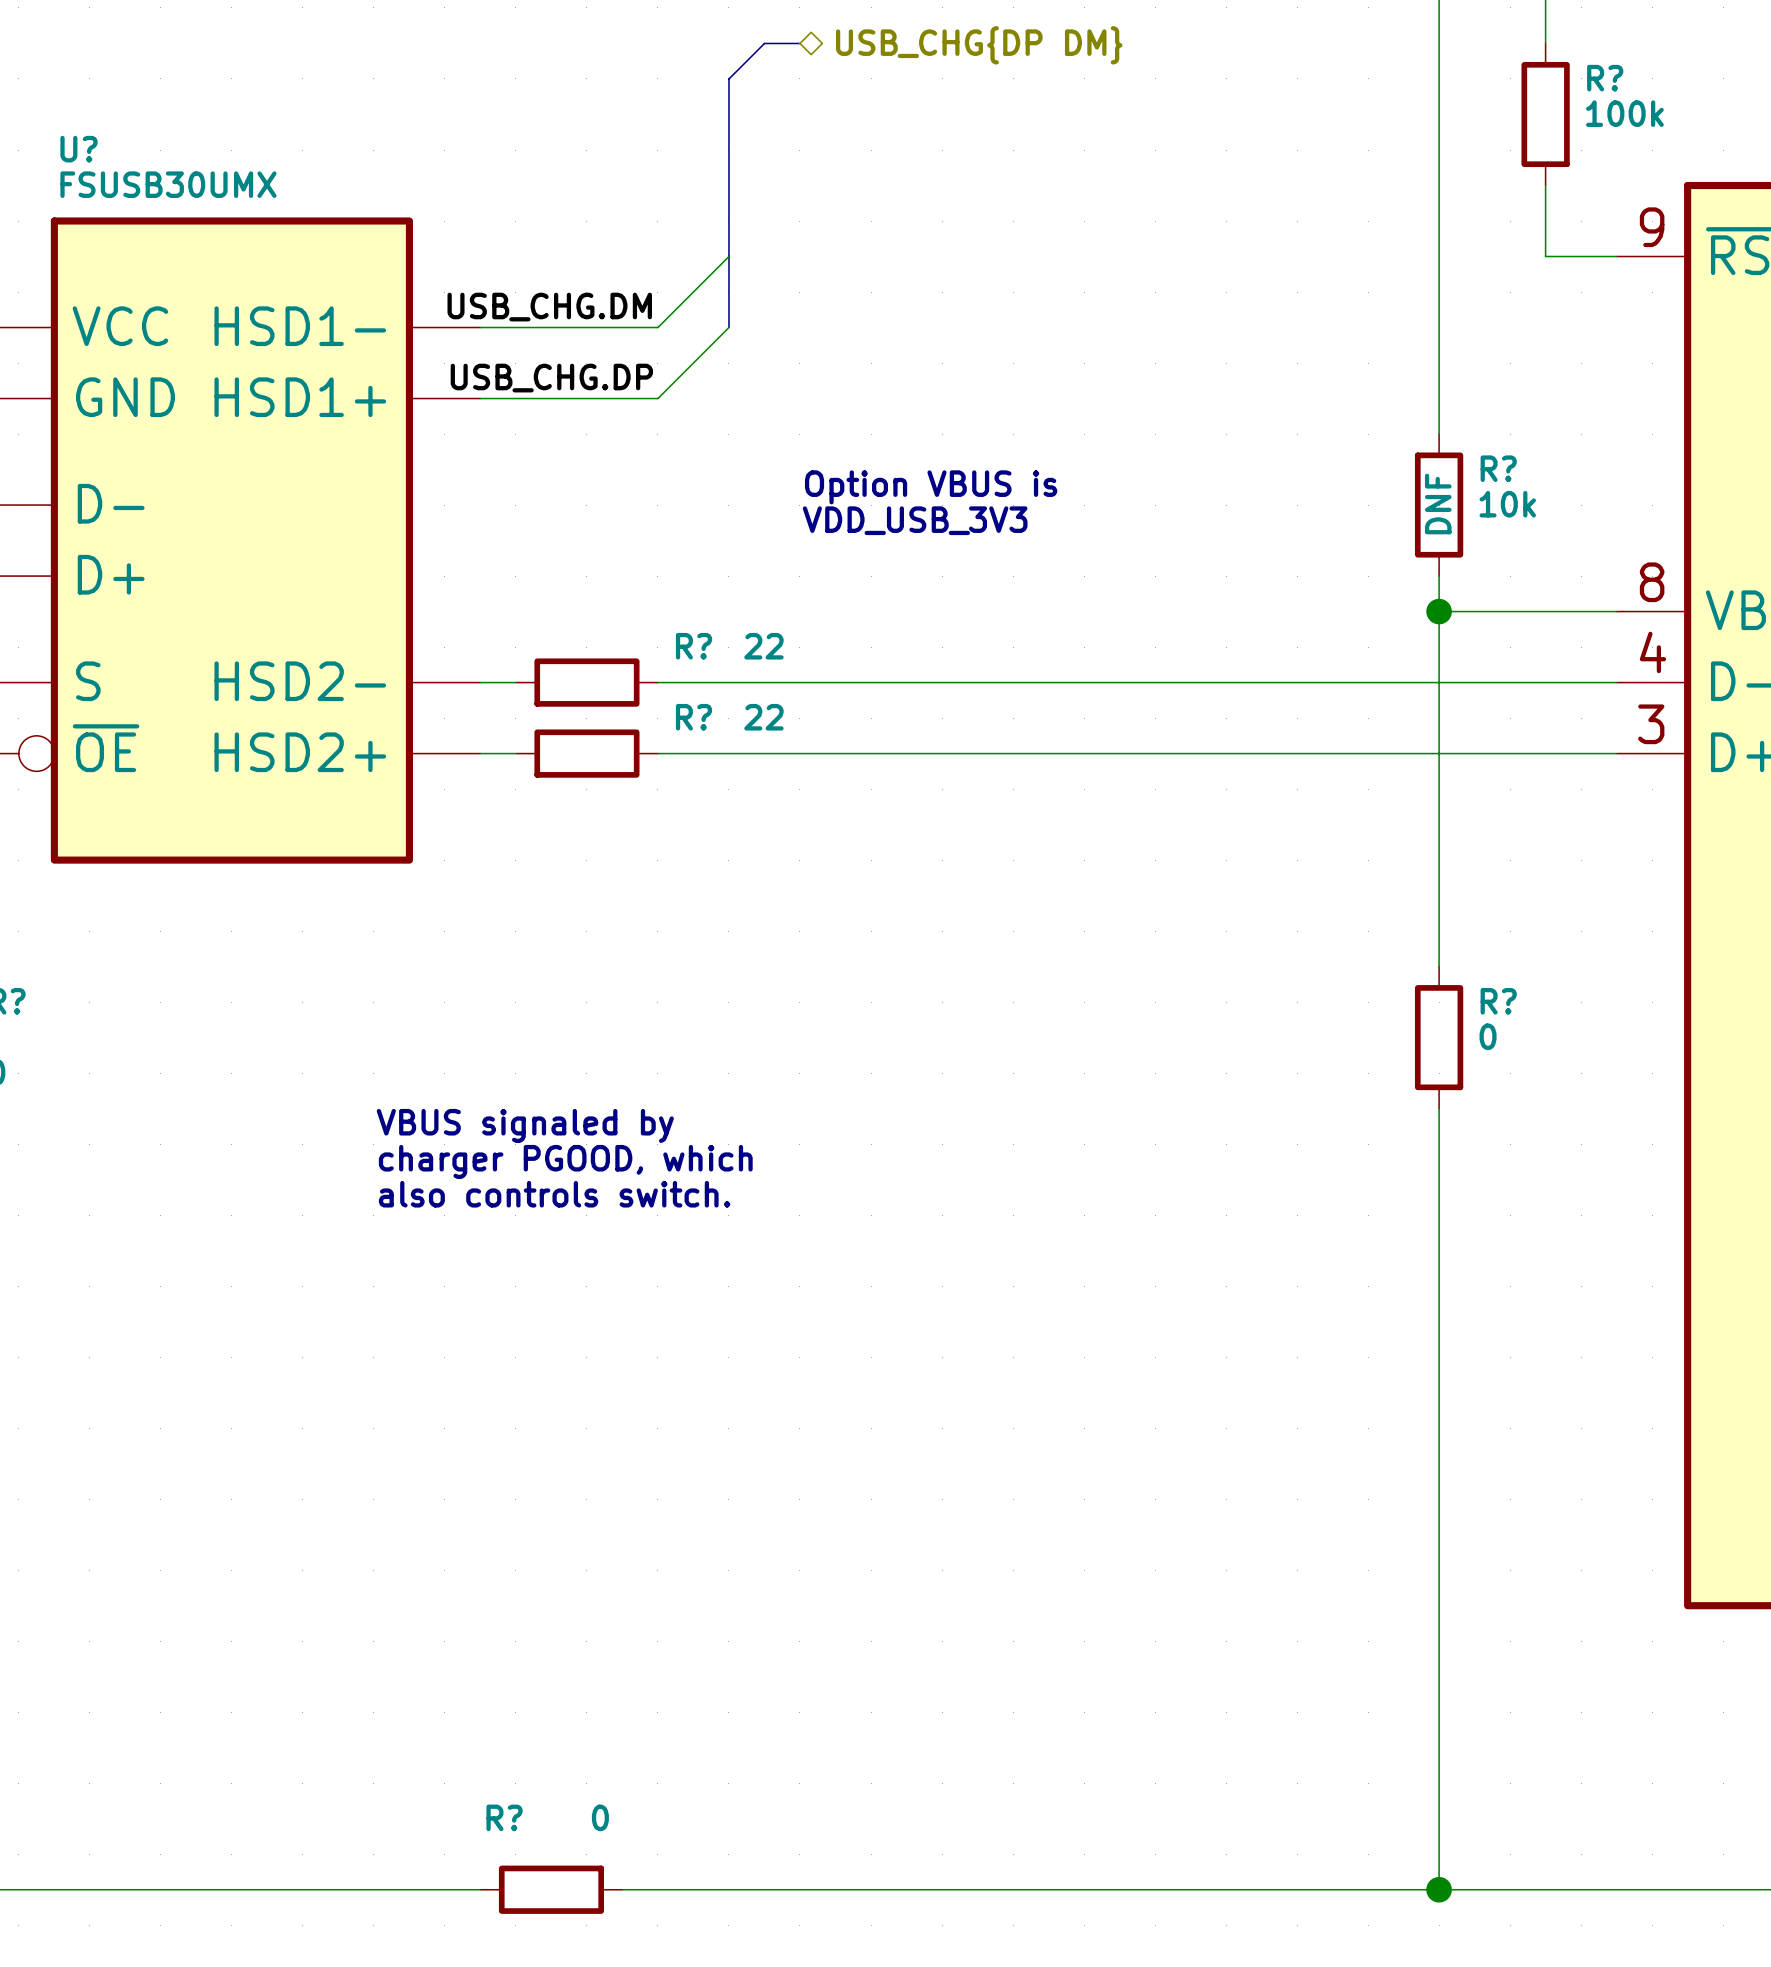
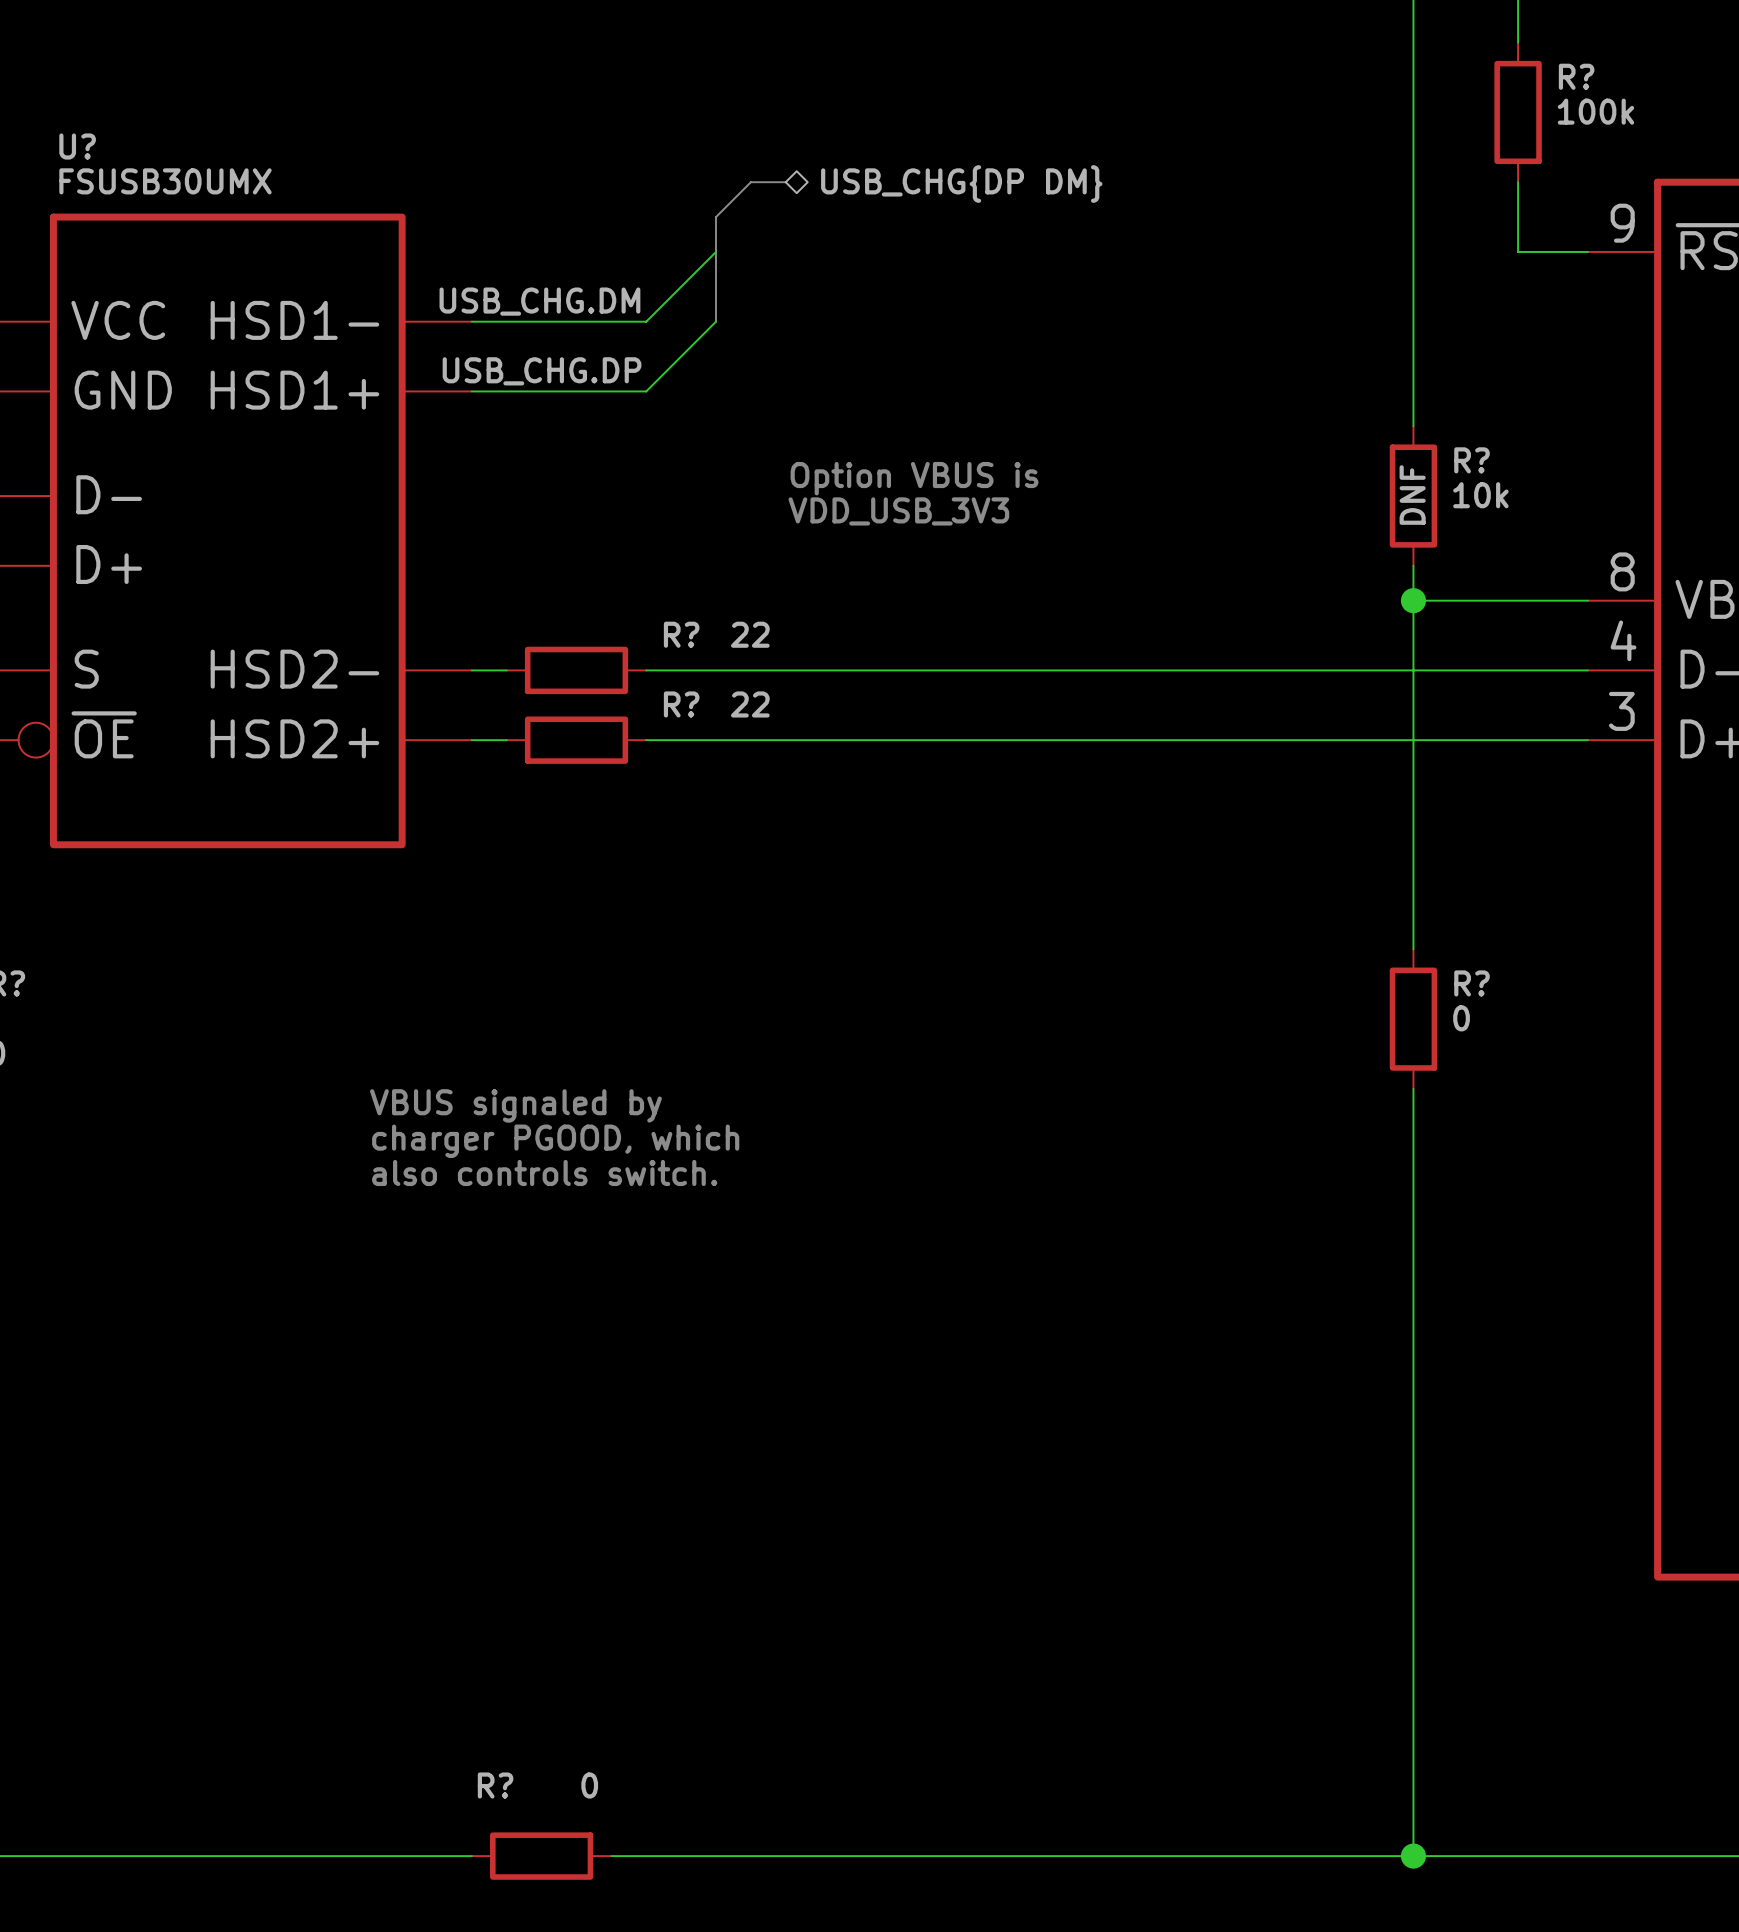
bus: (799, 43) (764, 43) (728, 78) (728, 221) -> (785, 182) (750, 182) (716, 217)
hierarchical label position: USB_CHG{DP DM} (979, 45) -> USB_CHG{DP DM} (961, 183)

